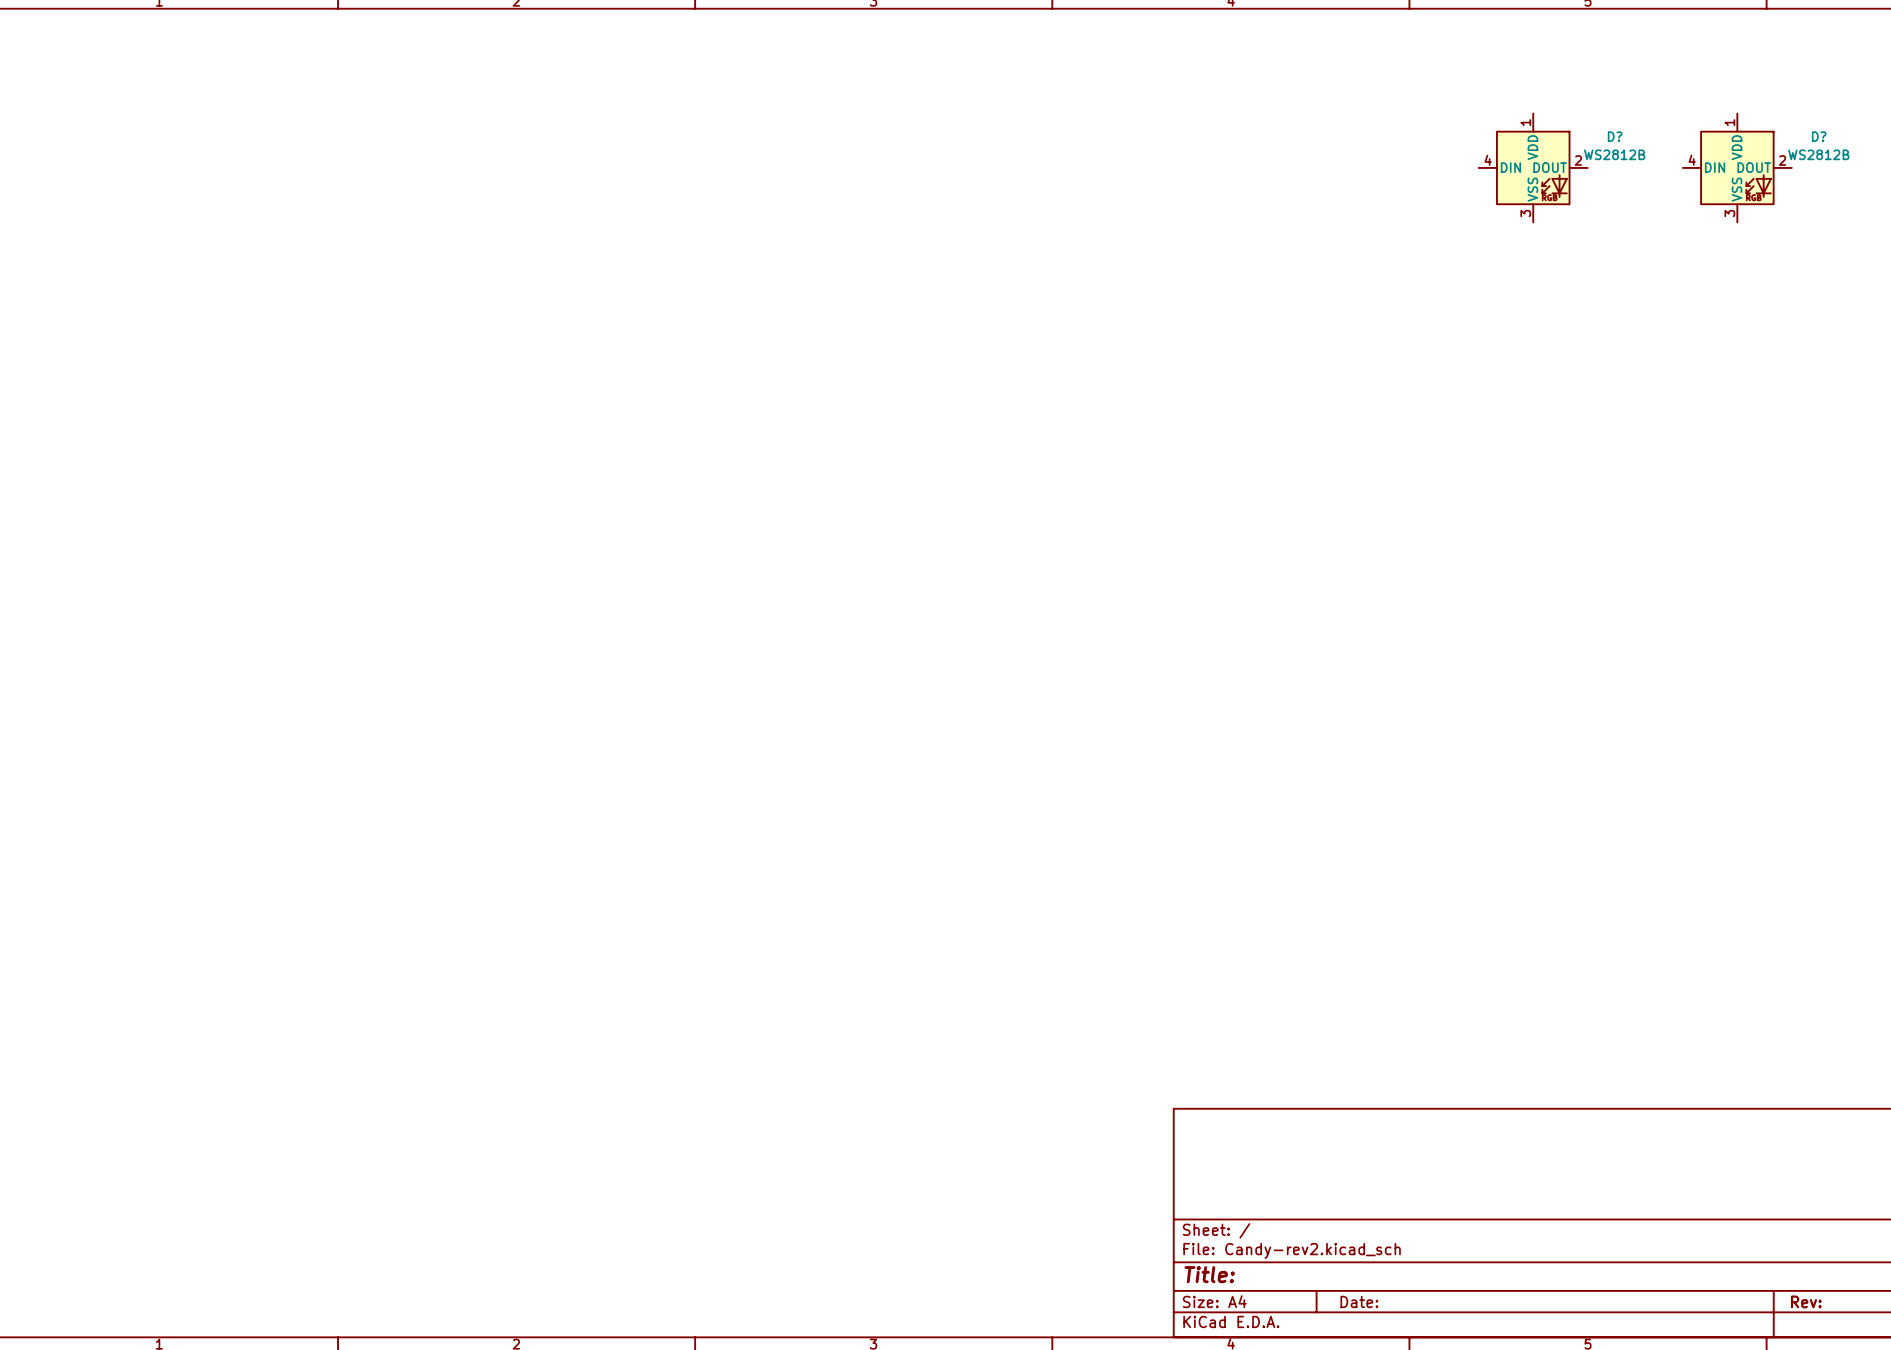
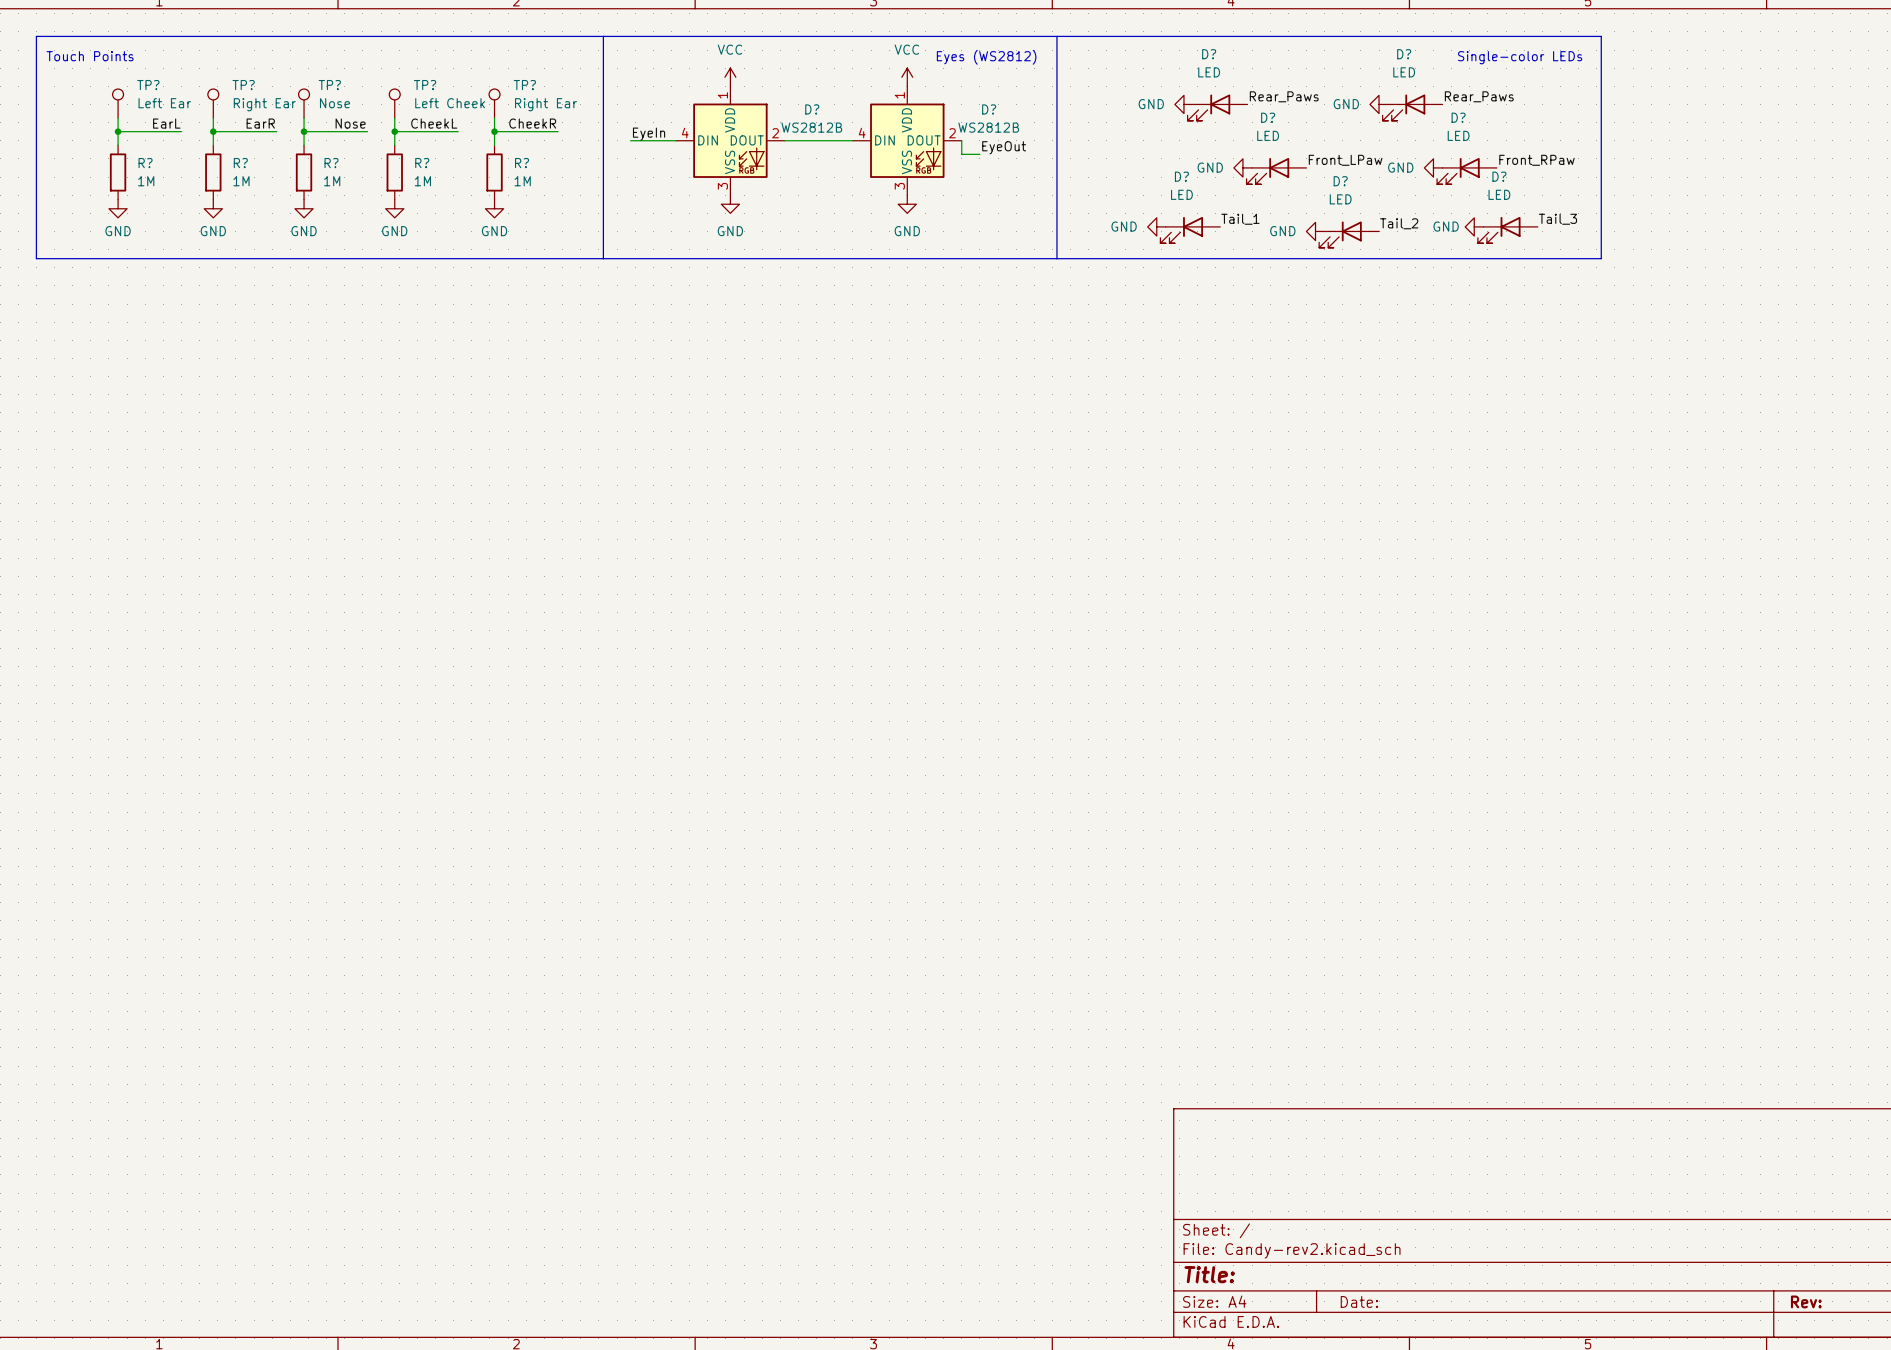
line: none -> (36, 36) (1601, 36) (1601, 258) (36, 258) (36, 36)
line: none -> (603, 36) (603, 258)
line: none -> (1056, 36) (1056, 258)
text: none -> Touch Points (90, 56)
text: none -> Eyes (WS2812) (986, 57)
text: none -> Single-color LEDs (1520, 57)
power symbol: none -> VCC (730, 77)
power symbol: none -> VCC (907, 77)
label: none -> Rear_Paws (1284, 96)
label: none -> Rear_Paws (1479, 96)
TP?: none -> Left Ear (118, 103)
TP?: none -> Right Ear (213, 103)
TP?: none -> Nose (304, 103)
TP?: none -> Left Cheek (394, 103)
TP?: none -> Right Ear (494, 103)
power symbol: none -> GND (1183, 104)
power symbol: none -> GND (1379, 104)
D?: none -> LED (1217, 107)
D?: none -> LED (1412, 107)
wire: none -> (118, 118) (118, 145)
wire: none -> (213, 118) (213, 145)
wire: none -> (304, 118) (304, 145)
wire: none -> (394, 118) (394, 145)
wire: none -> (494, 118) (494, 145)
label: none -> EarL (166, 123)
label: none -> EarR (260, 123)
label: none -> Nose (350, 123)
label: none -> CheekL (434, 123)
label: none -> CheekR (532, 123)
wire: none -> (118, 131) (181, 131)
junction: none -> (118, 131)
wire: none -> (213, 131) (276, 131)
junction: none -> (213, 131)
wire: none -> (304, 131) (367, 131)
junction: none -> (304, 131)
wire: none -> (394, 131) (458, 131)
junction: none -> (394, 131)
wire: none -> (494, 131) (558, 131)
junction: none -> (494, 131)
label: none -> EyeIn (649, 134)
wire: none -> (630, 140) (675, 140)
D?: none -> WS2812B (730, 140)
wire: none -> (784, 140) (852, 140)
D?: none -> WS2812B (907, 140)
wire: none -> (961, 140) (961, 154) (979, 154)
label: none -> EyeOut (1004, 147)
label: none -> Front_LPaw (1345, 160)
label: none -> Front_RPaw (1536, 160)
power symbol: none -> GND (1242, 167)
power symbol: none -> GND (1433, 167)
D?: WS2812B (1533, 167) -> none
D?: WS2812B (1737, 167) -> none
D?: none -> LED (1276, 171)
D?: none -> LED (1467, 171)
R?: none -> 1M (118, 172)
R?: none -> 1M (213, 172)
R?: none -> 1M (304, 172)
R?: none -> 1M (394, 172)
R?: none -> 1M (494, 172)
power symbol: none -> GND (730, 204)
power symbol: none -> GND (907, 204)
power symbol: none -> GND (118, 208)
power symbol: none -> GND (213, 208)
power symbol: none -> GND (304, 208)
power symbol: none -> GND (394, 208)
power symbol: none -> GND (494, 208)
label: none -> Tail_1 (1240, 219)
label: none -> Tail_3 (1557, 219)
label: none -> Tail_2 (1399, 223)
power symbol: none -> GND (1156, 226)
power symbol: none -> GND (1474, 226)
D?: none -> LED (1190, 230)
D?: none -> LED (1507, 230)
power symbol: none -> GND (1315, 231)
D?: none -> LED (1349, 234)

